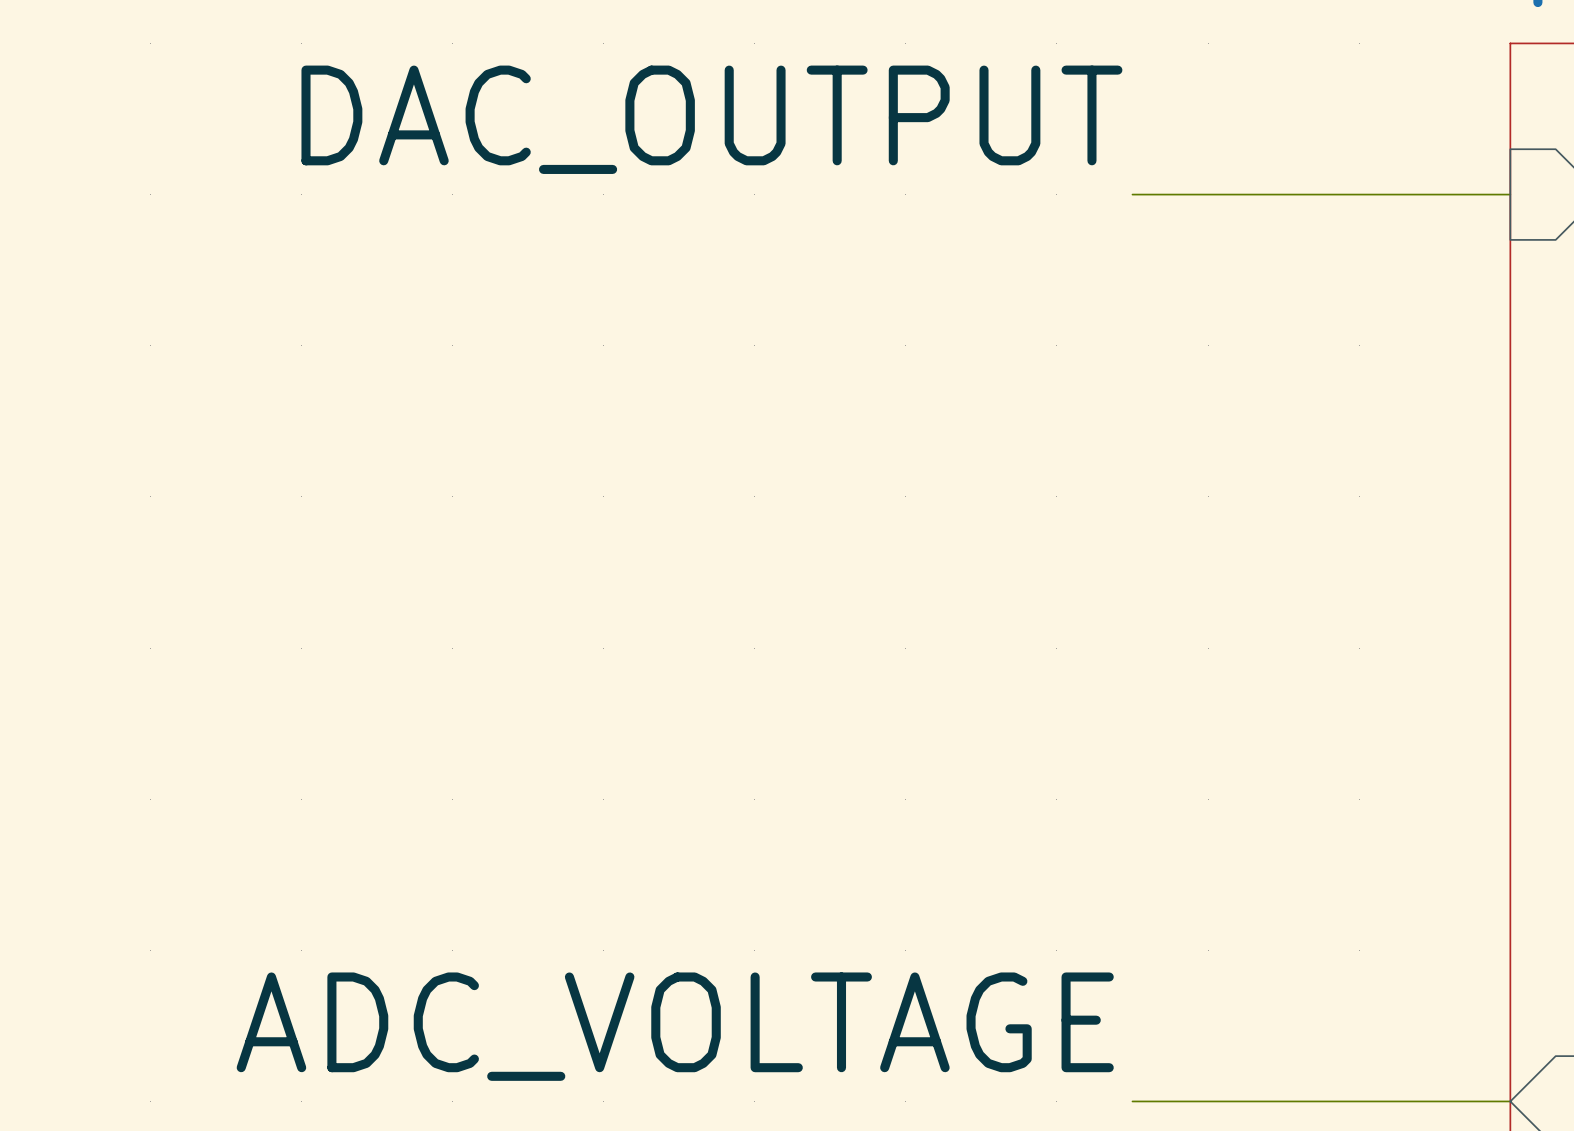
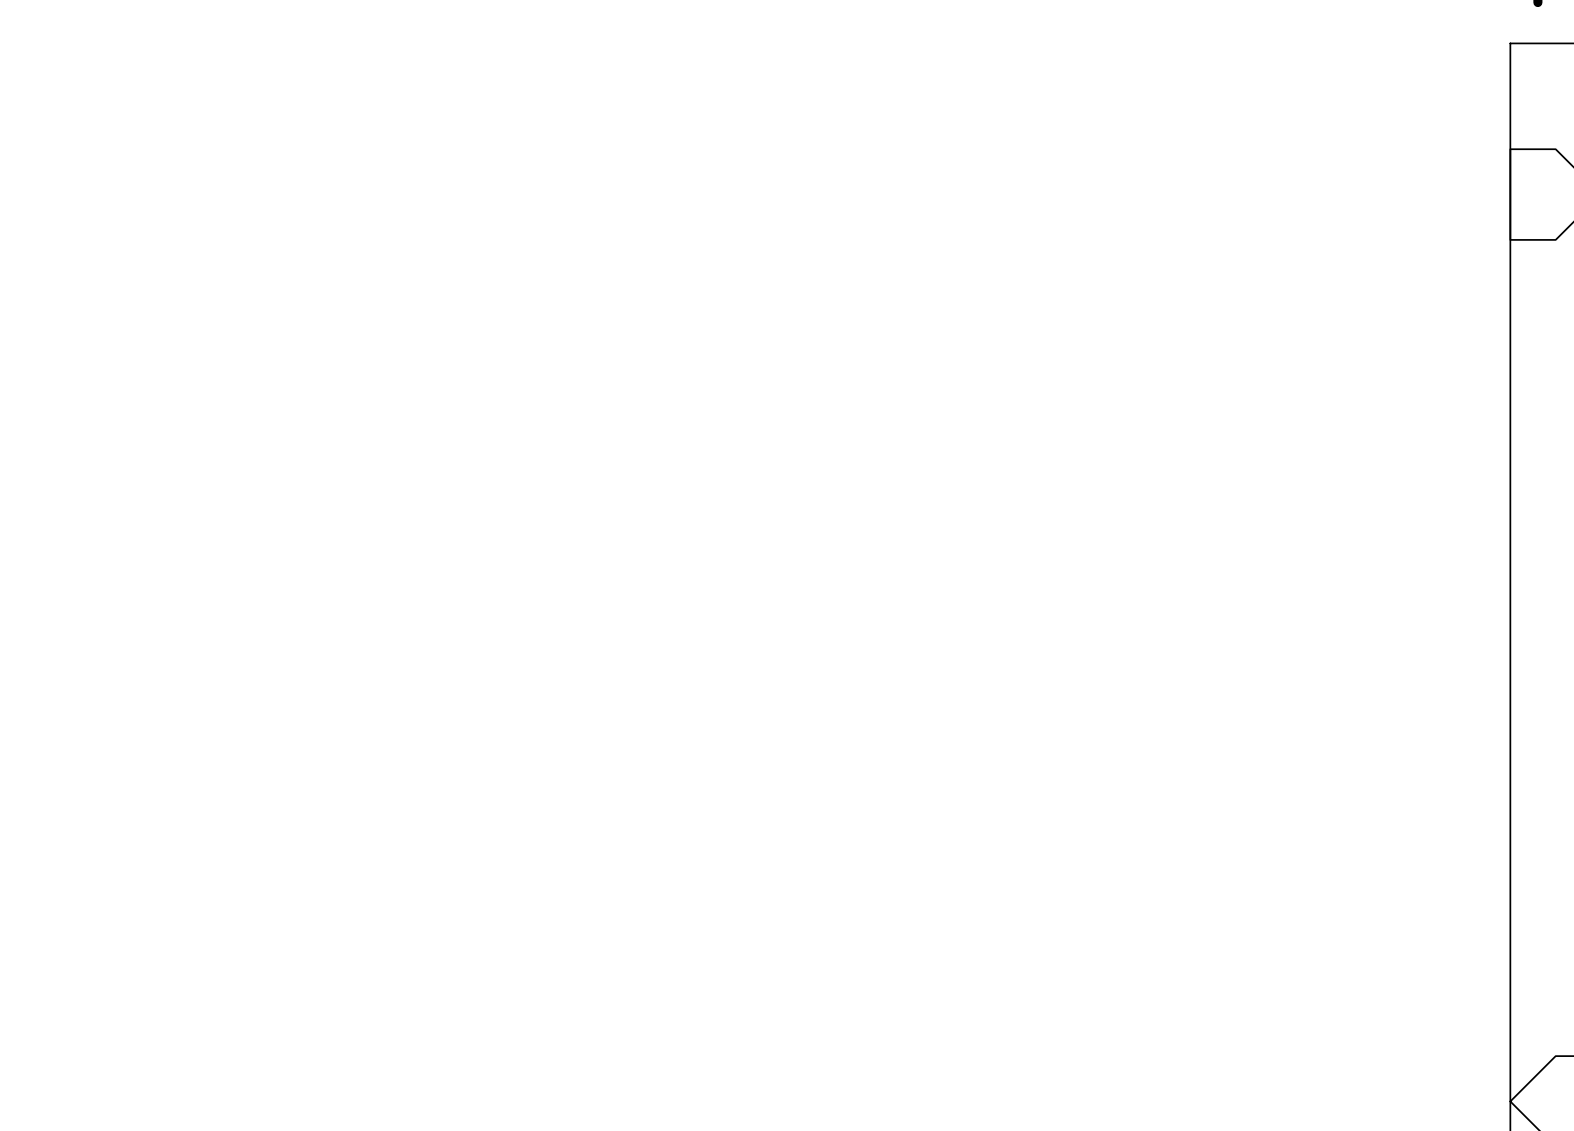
label: DAC_OUTPUT (711, 119) -> none
wire: (1132, 194) (1510, 194) -> none
label: ADC_VOLTAGE (675, 1026) -> none
wire: (1132, 1101) (1510, 1101) -> none

